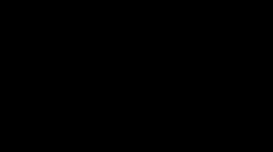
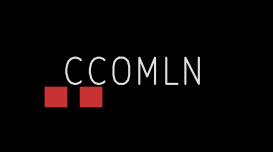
CCOMLN: none -> (73, 96)

